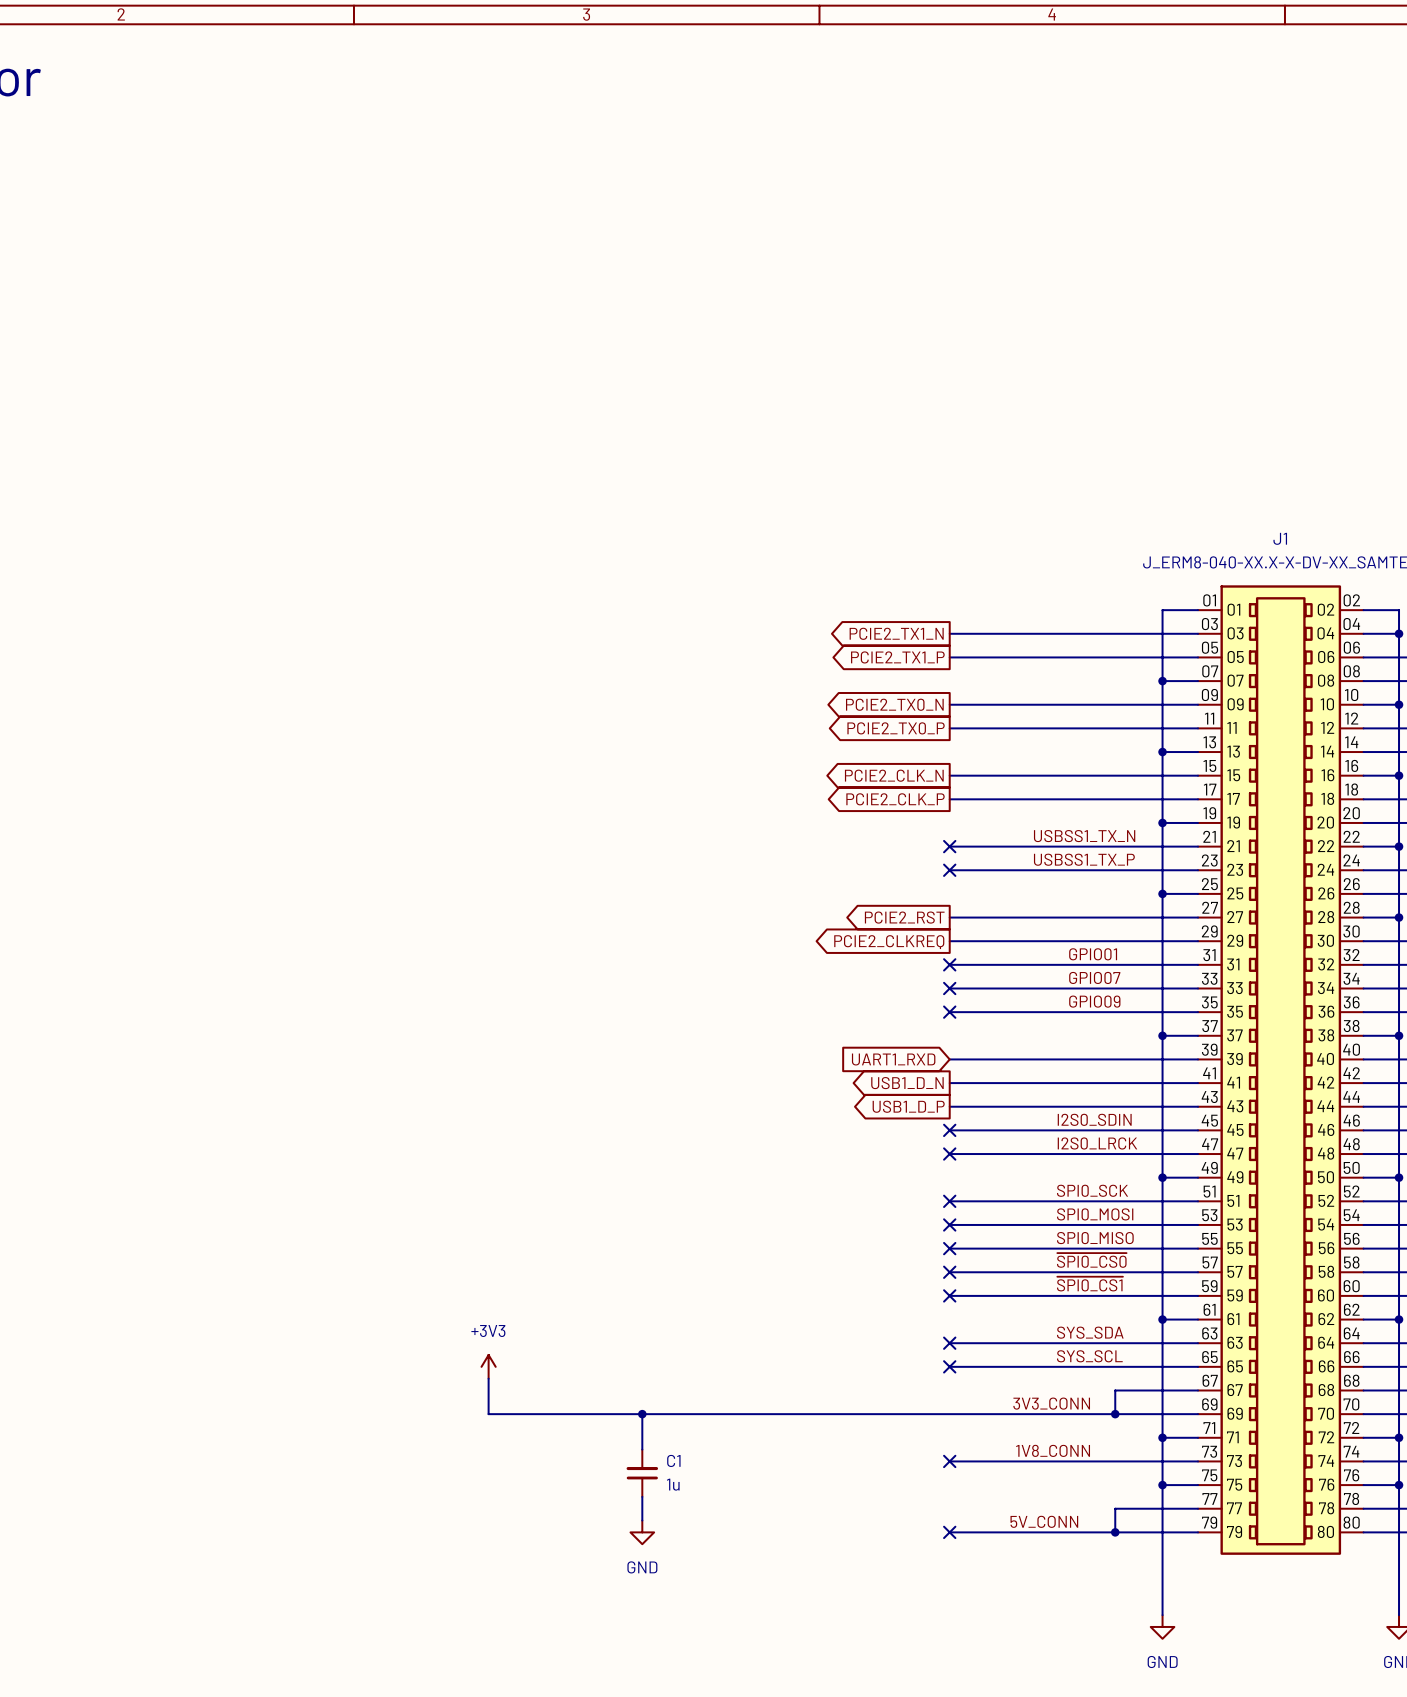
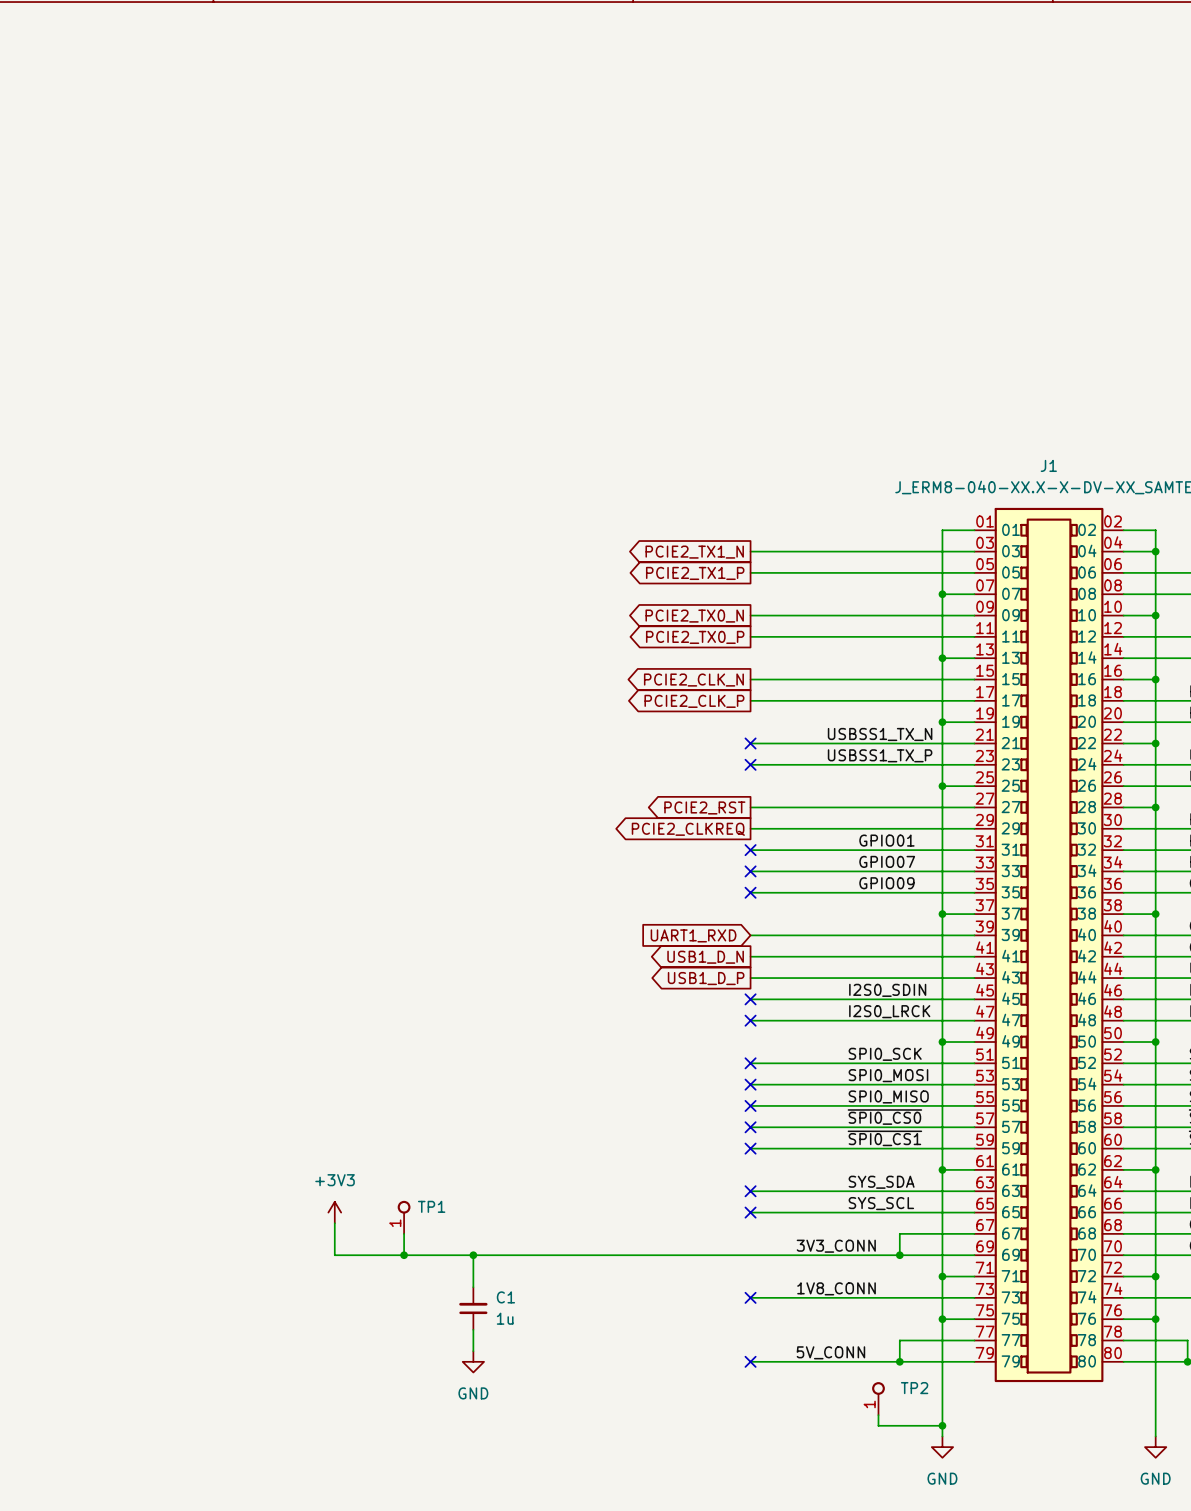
TP1: none -> (404, 1217)
wire: none -> (404, 1233) (404, 1255)
junction: none -> (404, 1255)
TP2: none -> (878, 1398)
wire: none -> (878, 1415) (878, 1425) (942, 1425)
junction: none -> (942, 1425)

